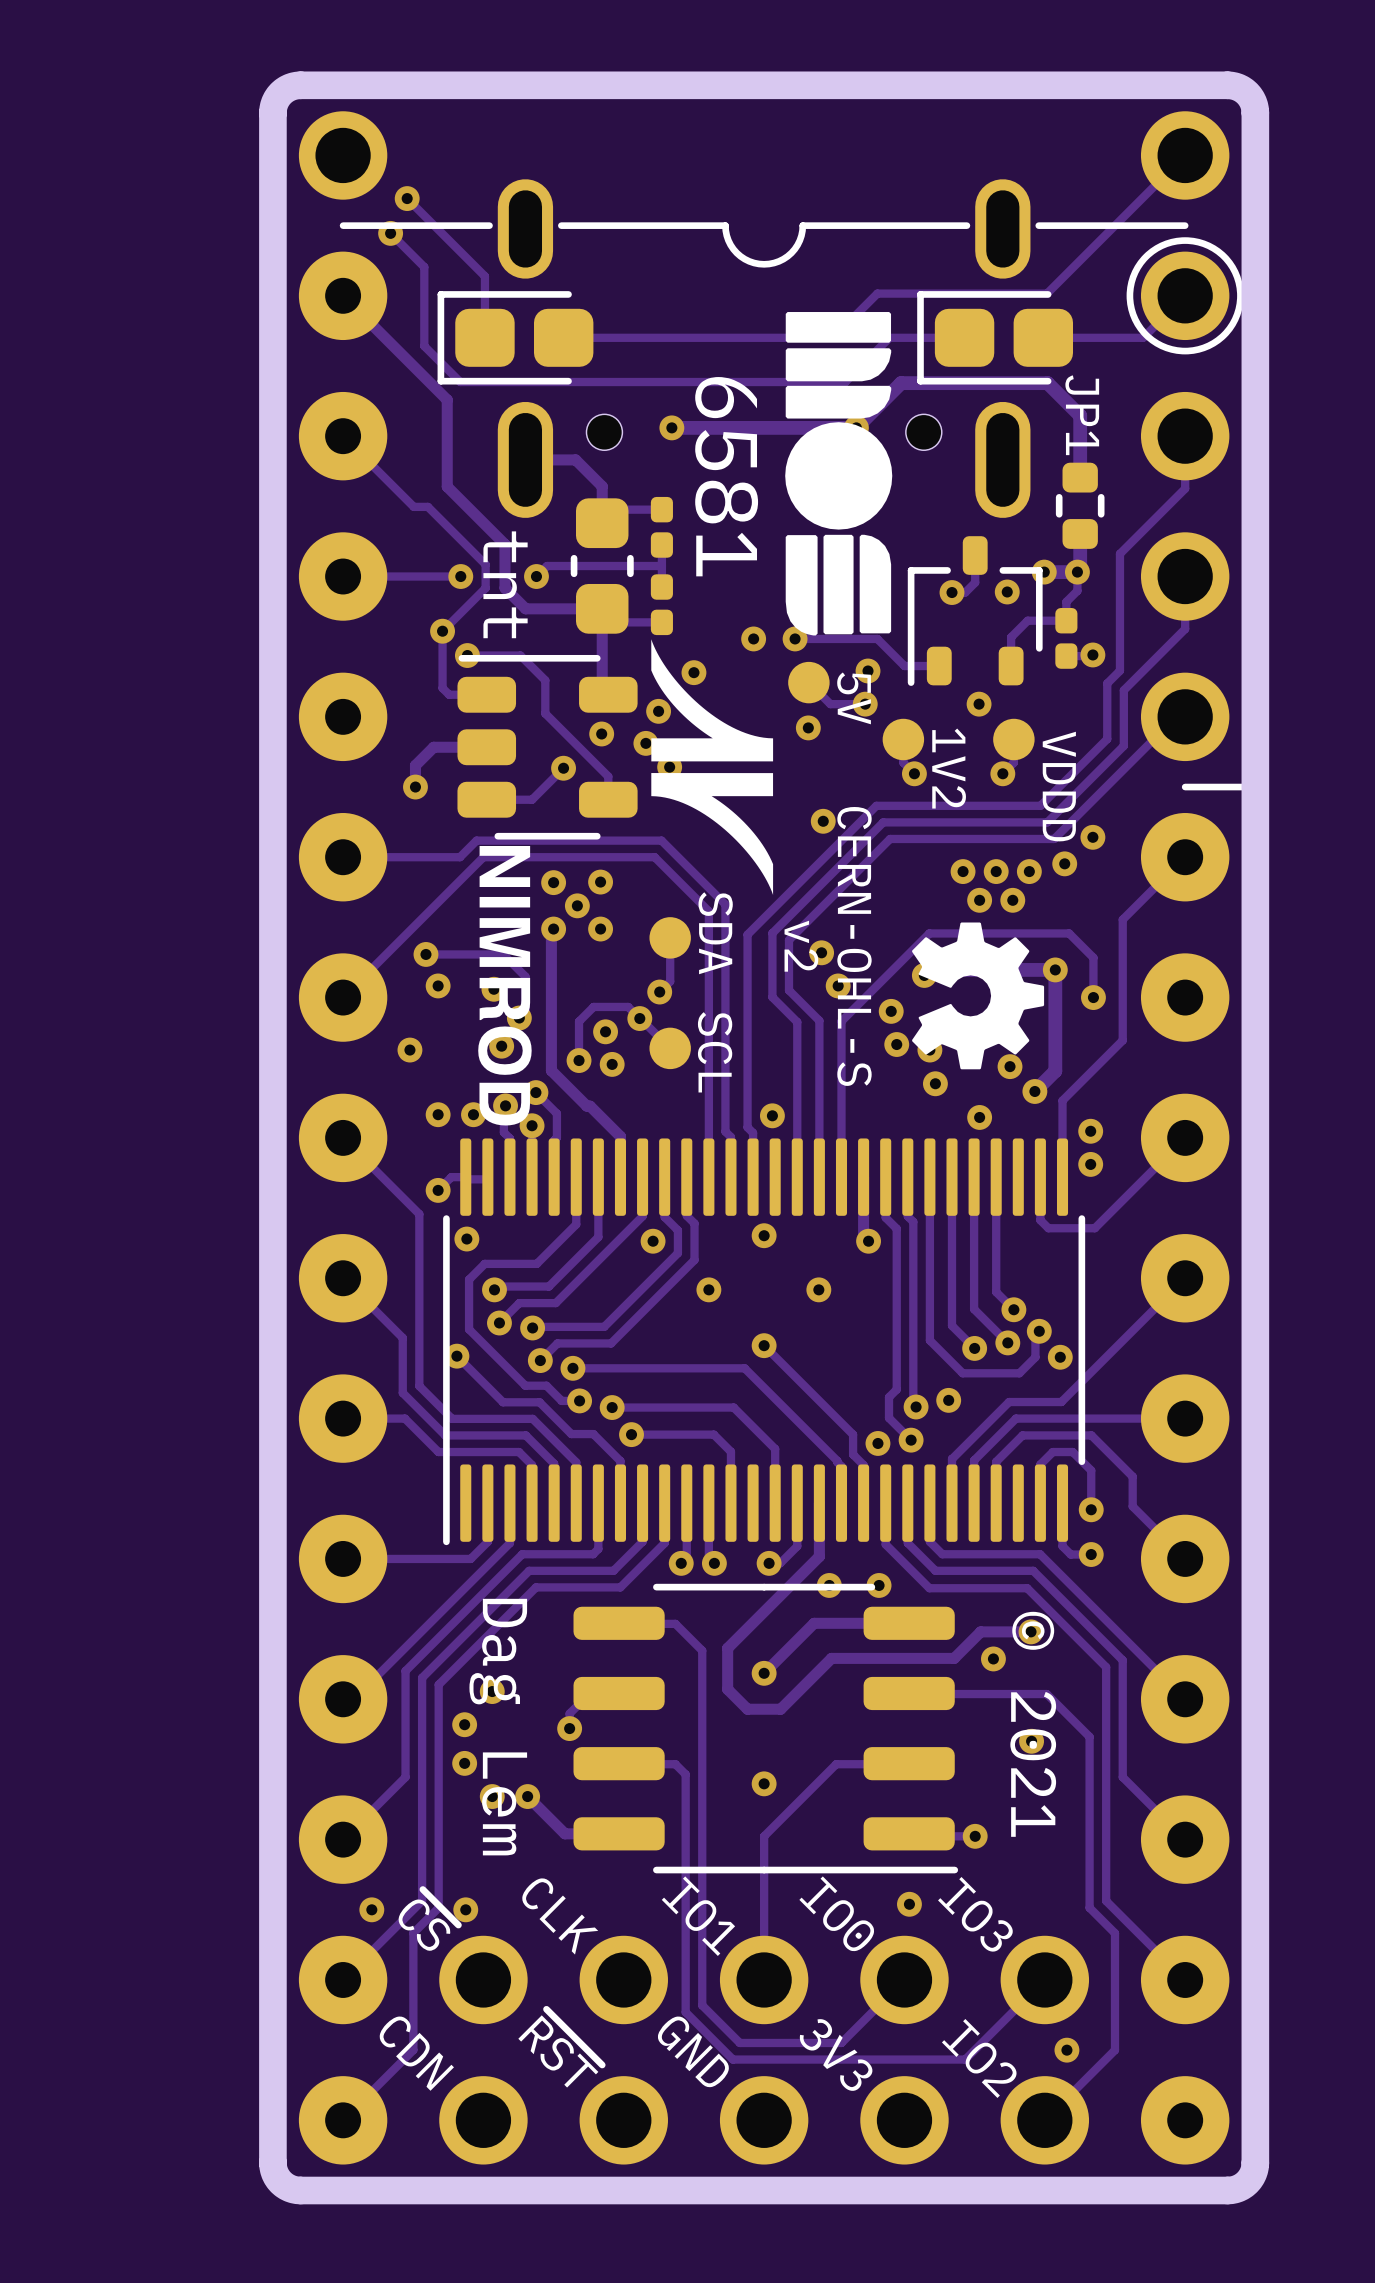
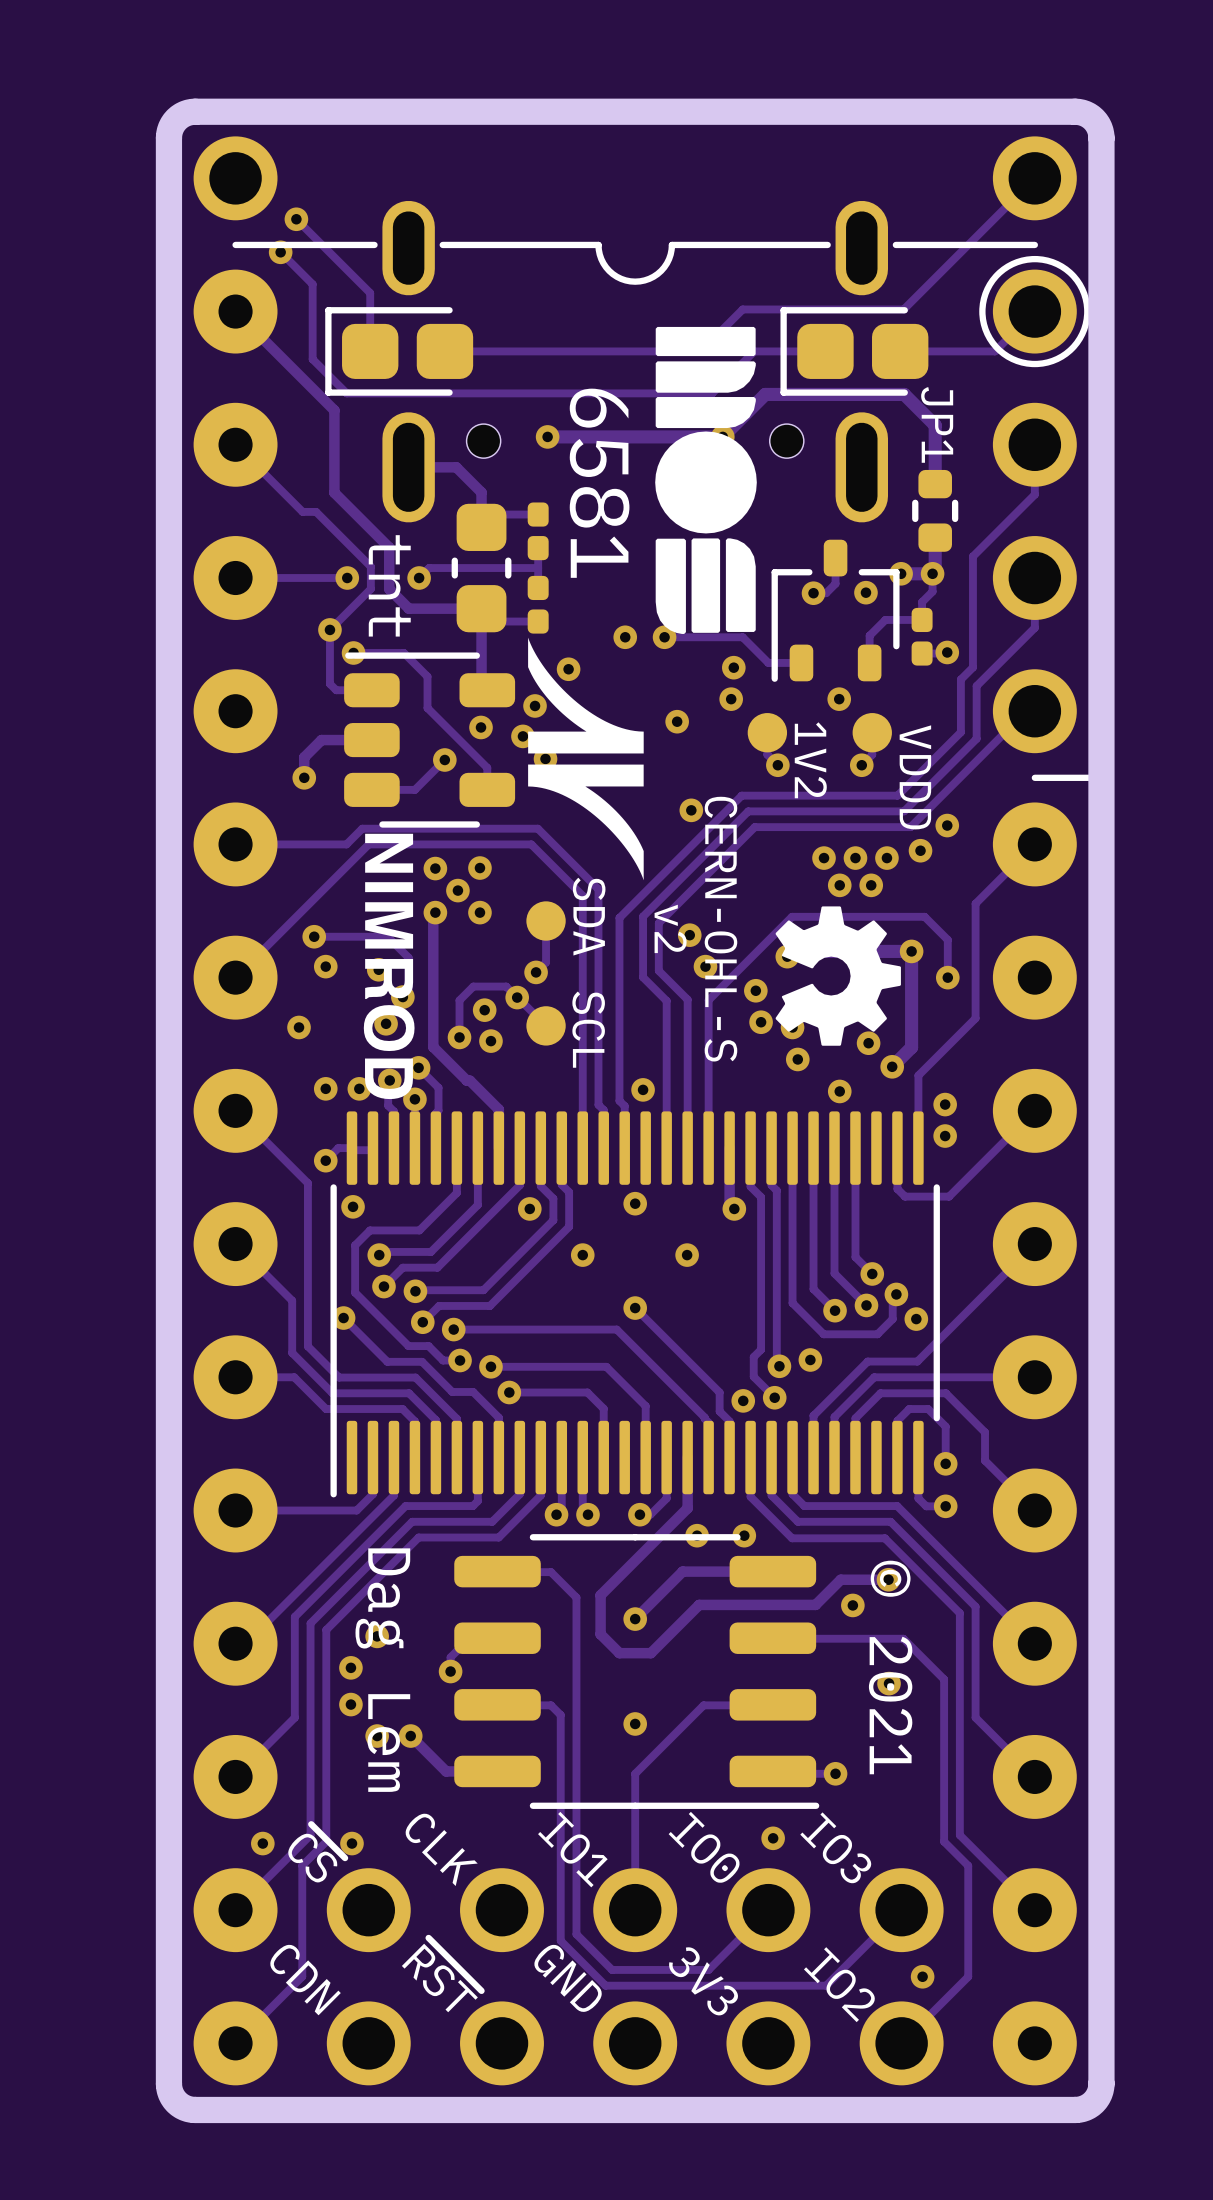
track: (808, 682) (830, 704) (865, 704) -> none
part: (808, 682) -> none
text: 5V (854, 698) -> none

